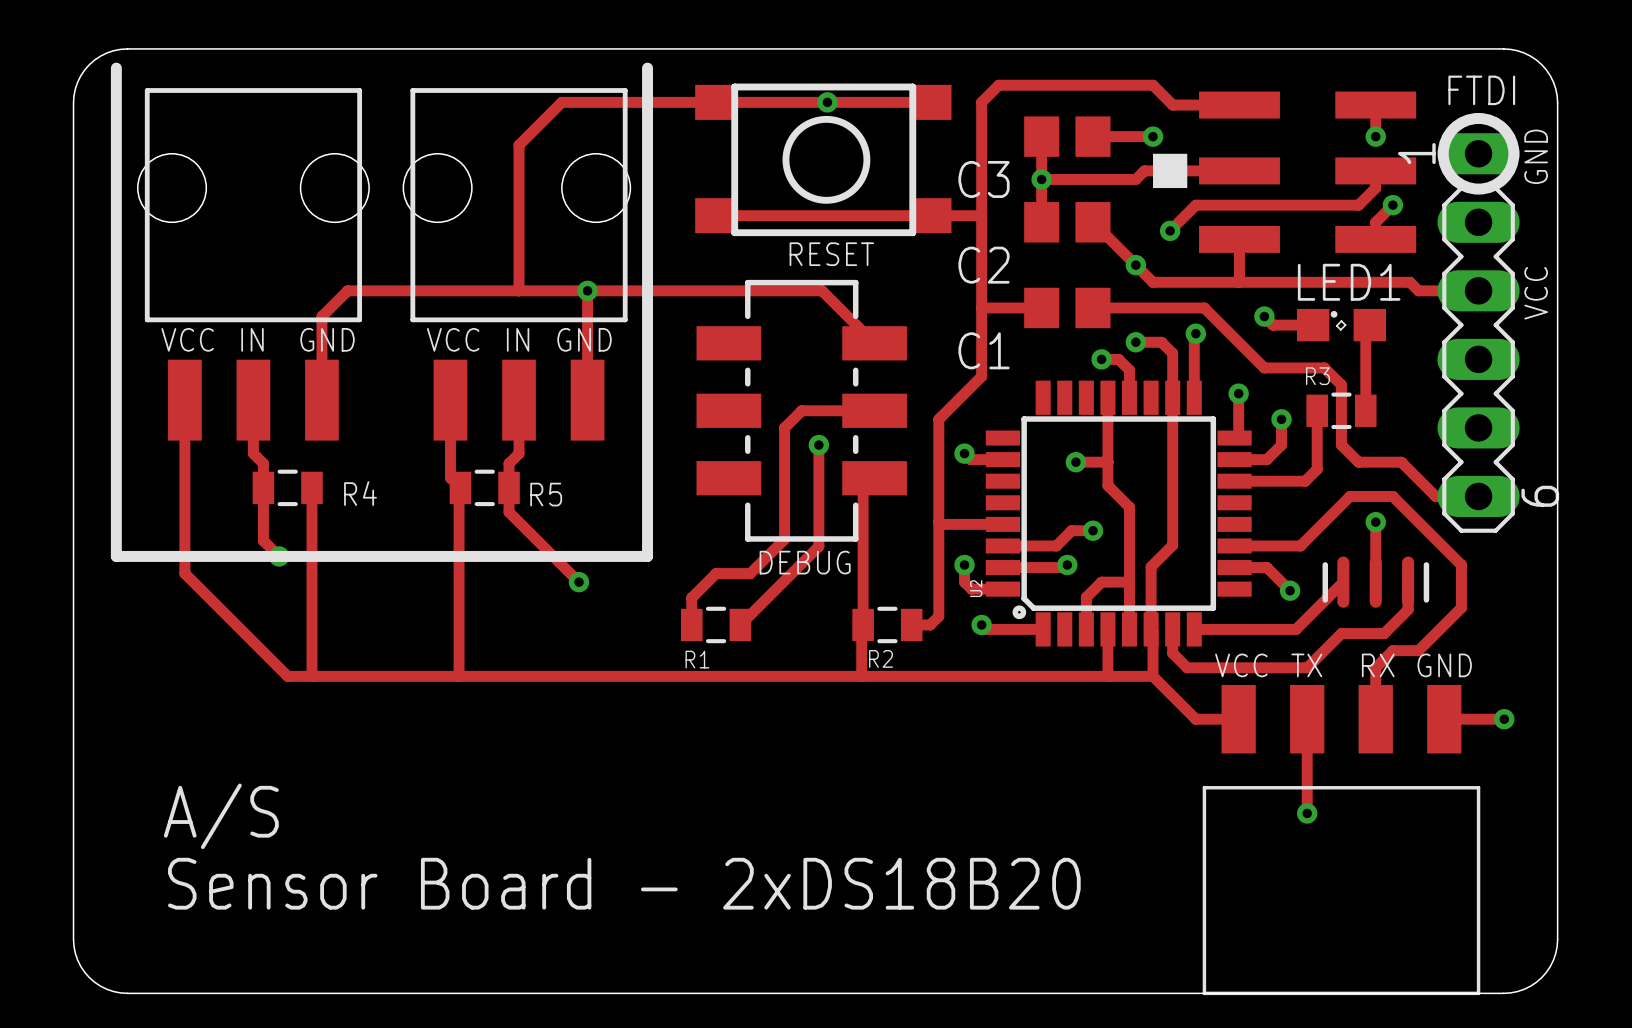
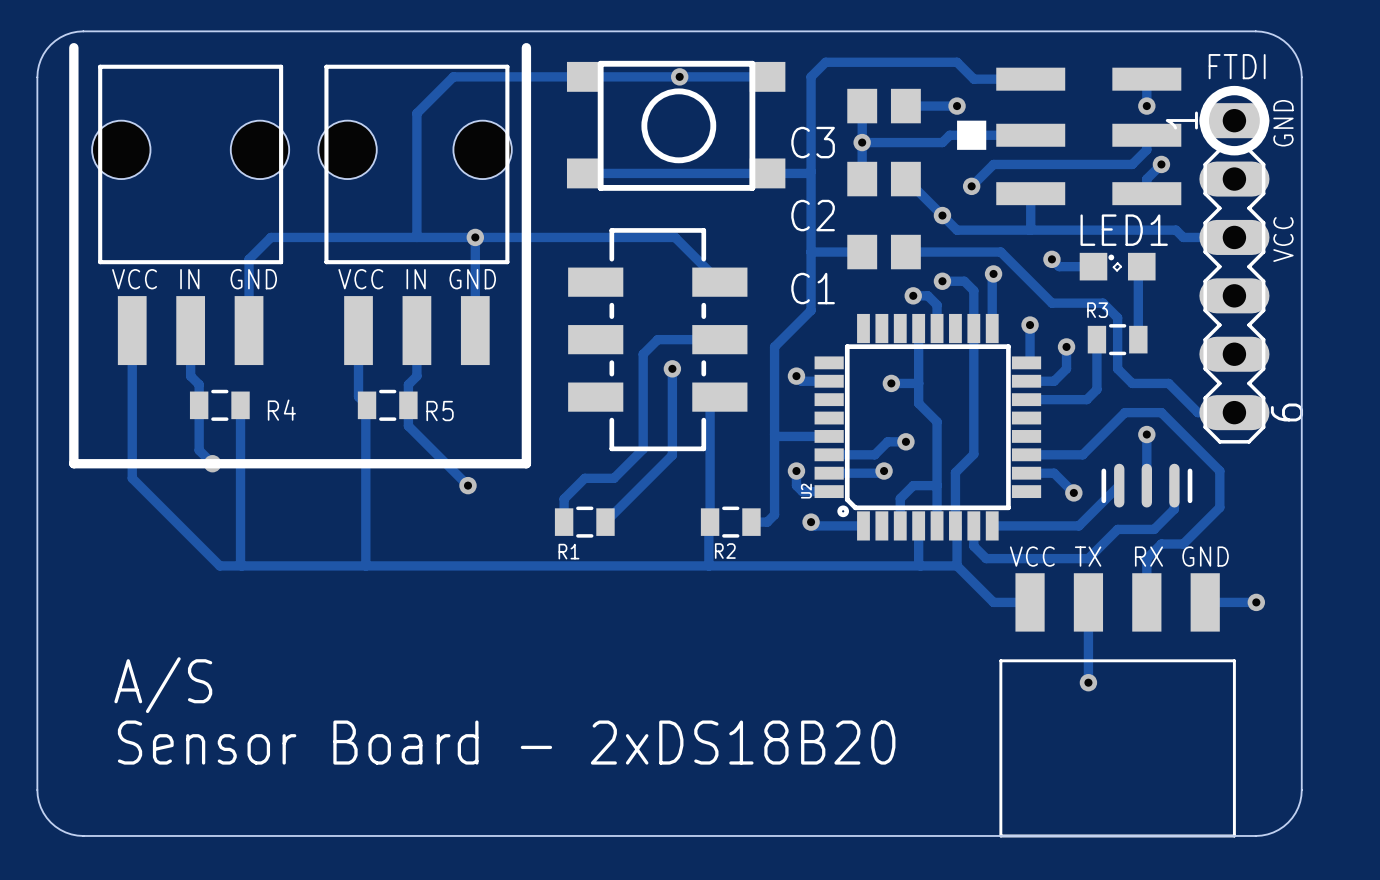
text: RESET (831, 254) -> none
text: DEBUG (805, 562) -> none

